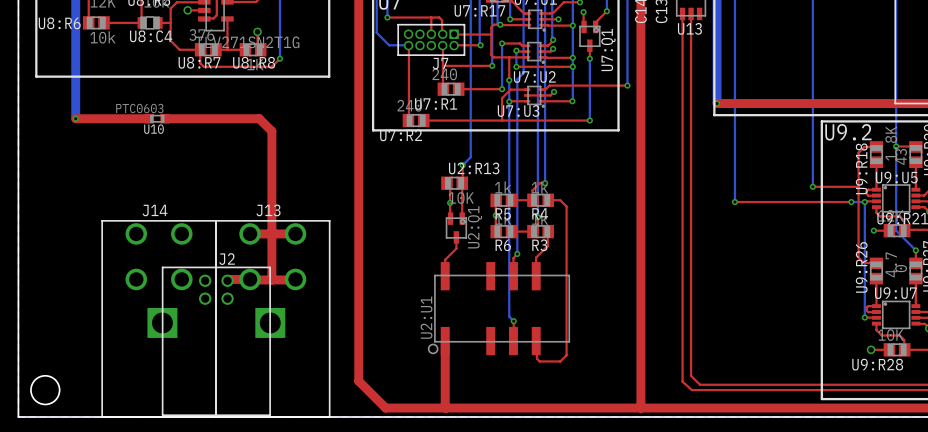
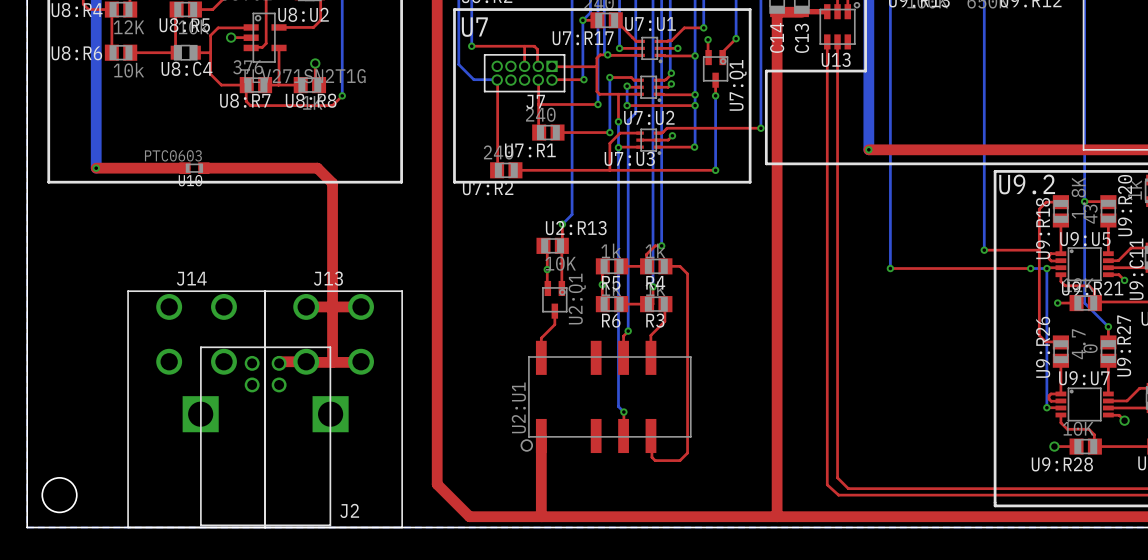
line: (714, 38) (714, 115) -> (865, 71) (766, 71) (766, 163) (865, 163)
line: (36, 76) (329, 76) -> (48, 117) (48, 182) (401, 182) (401, 117)
J2 name position: J2 (227, 259) -> J2 (349, 510)

